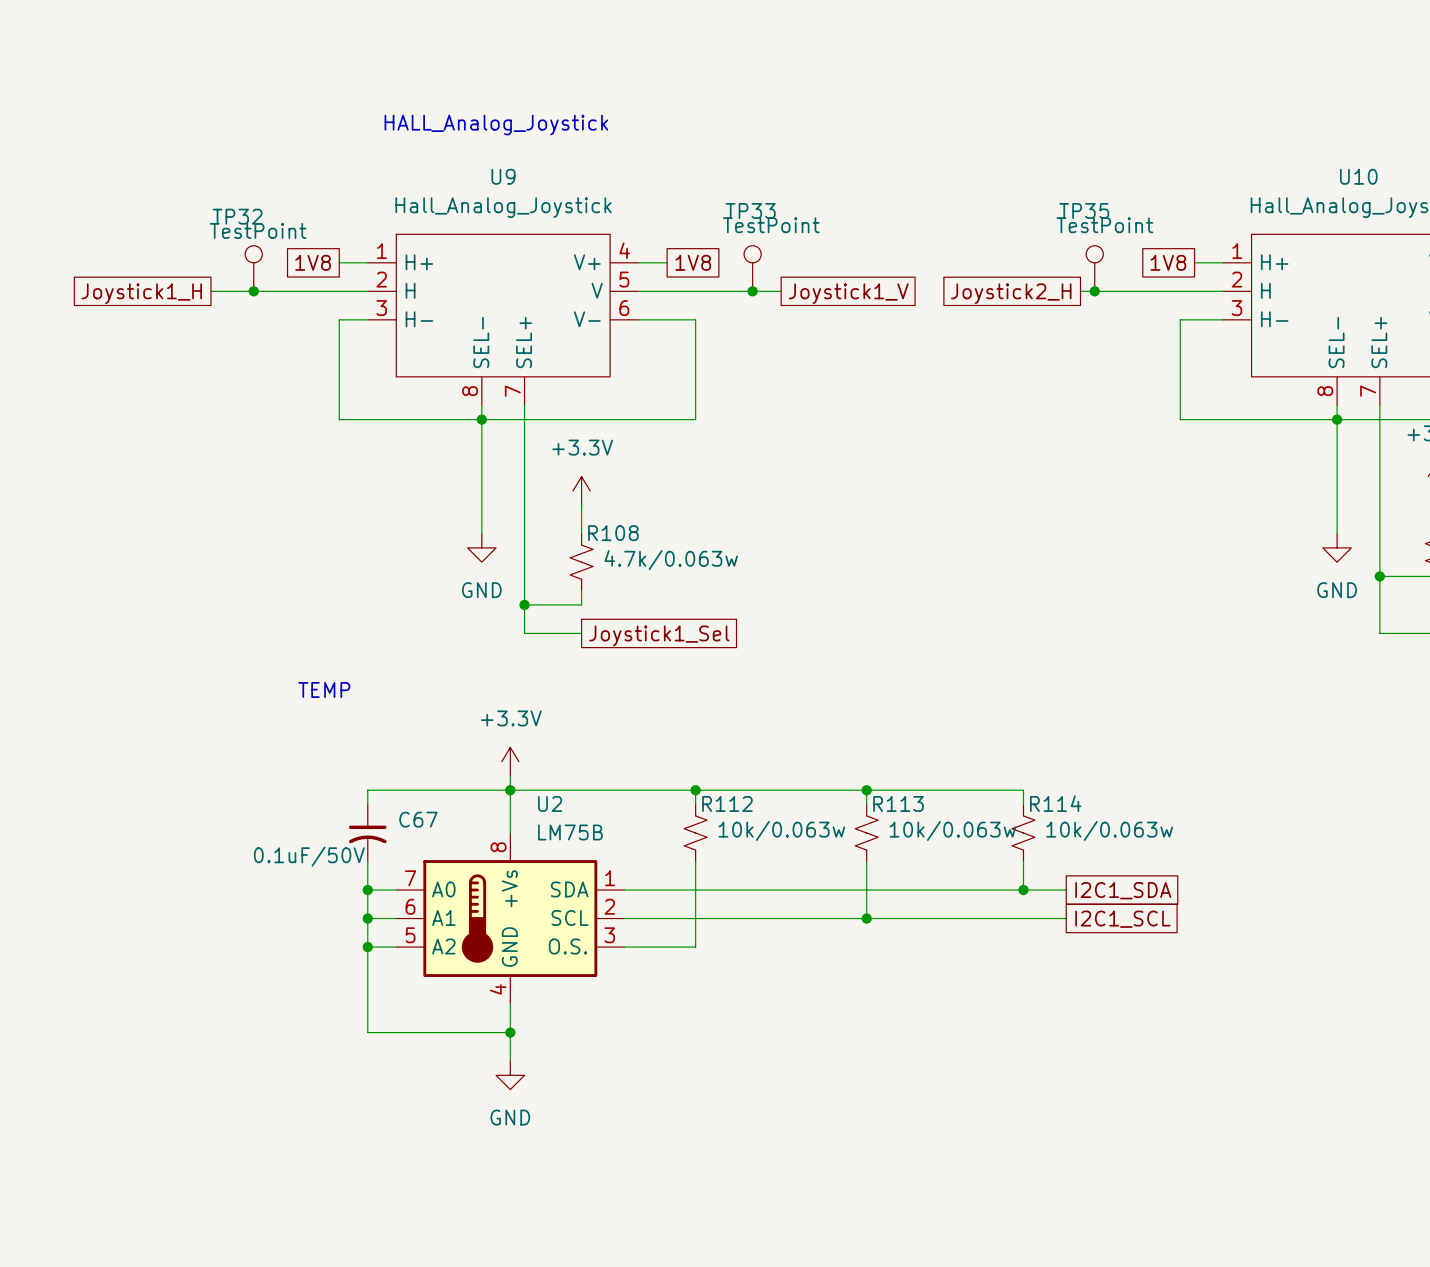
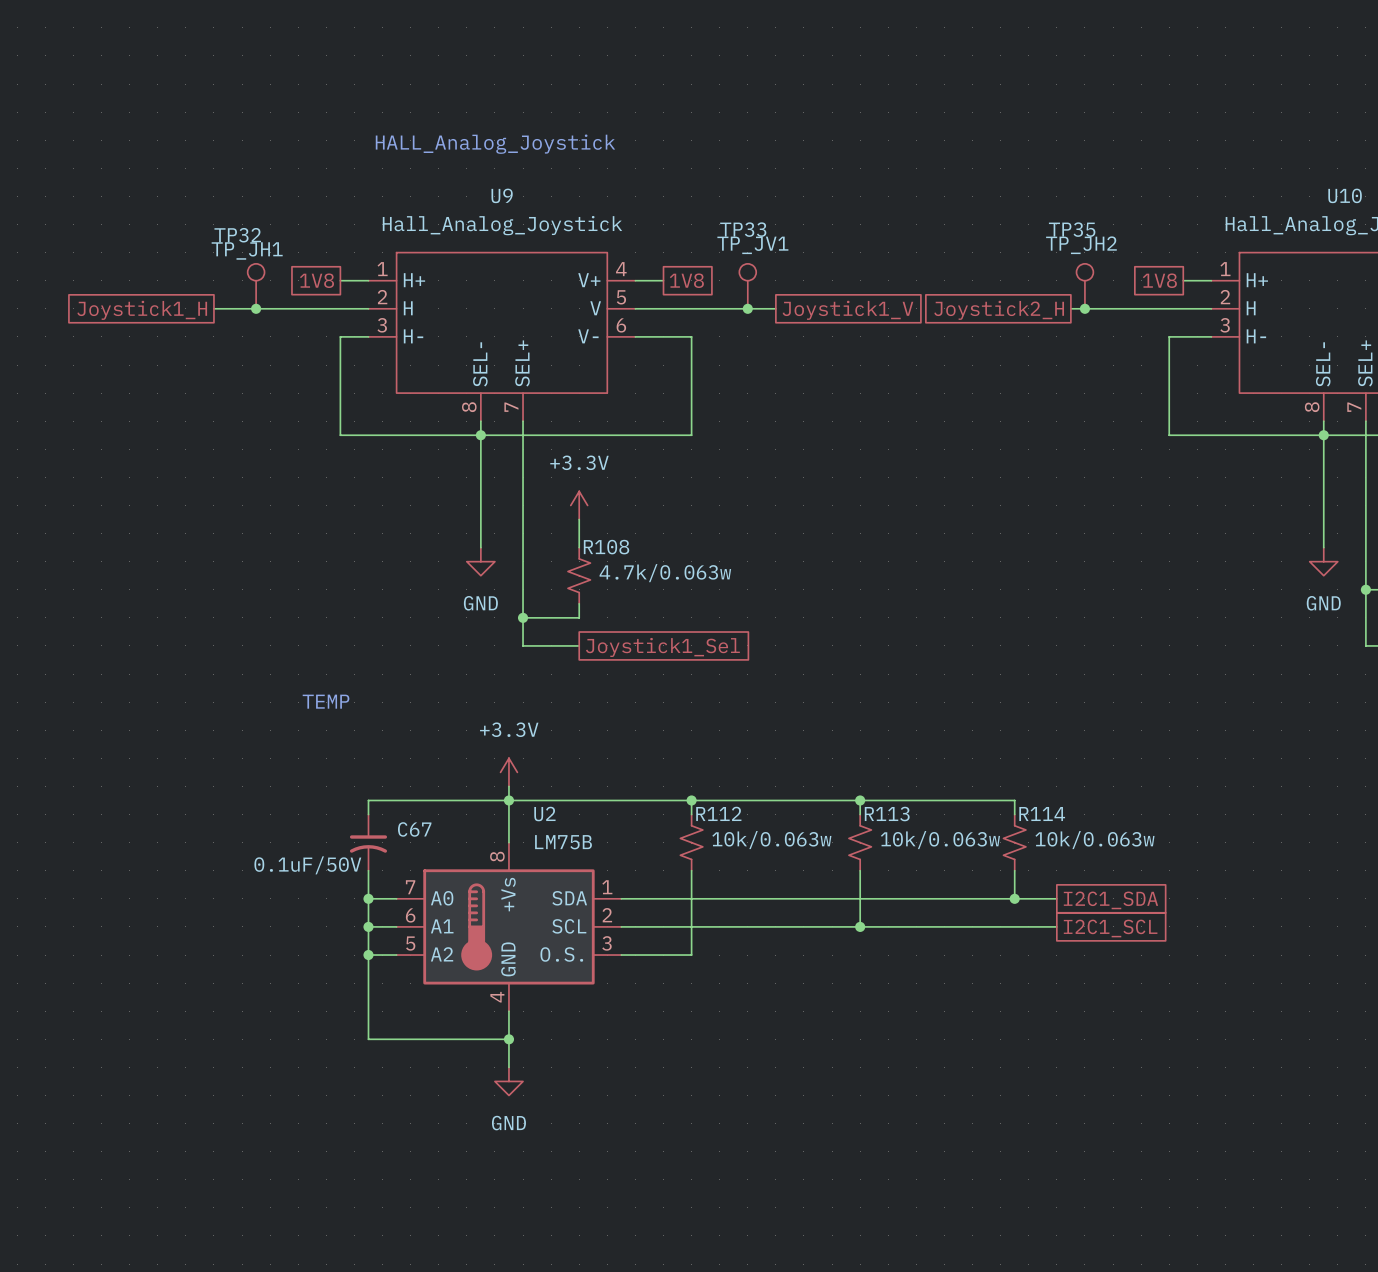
TP33 value: TestPoint (771, 225) -> TP_JV1 (752, 245)
TP35 value: TestPoint (1104, 225) -> TP_JH2 (1081, 245)
TP32 value: TestPoint (258, 230) -> TP_JH1 (247, 250)

